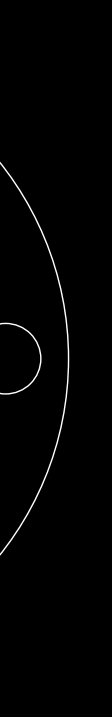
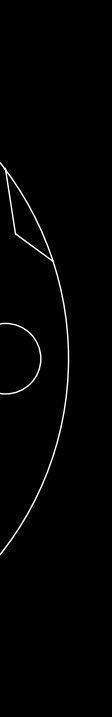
board edge: none -> (5, 168) (15, 233) (53, 261)

